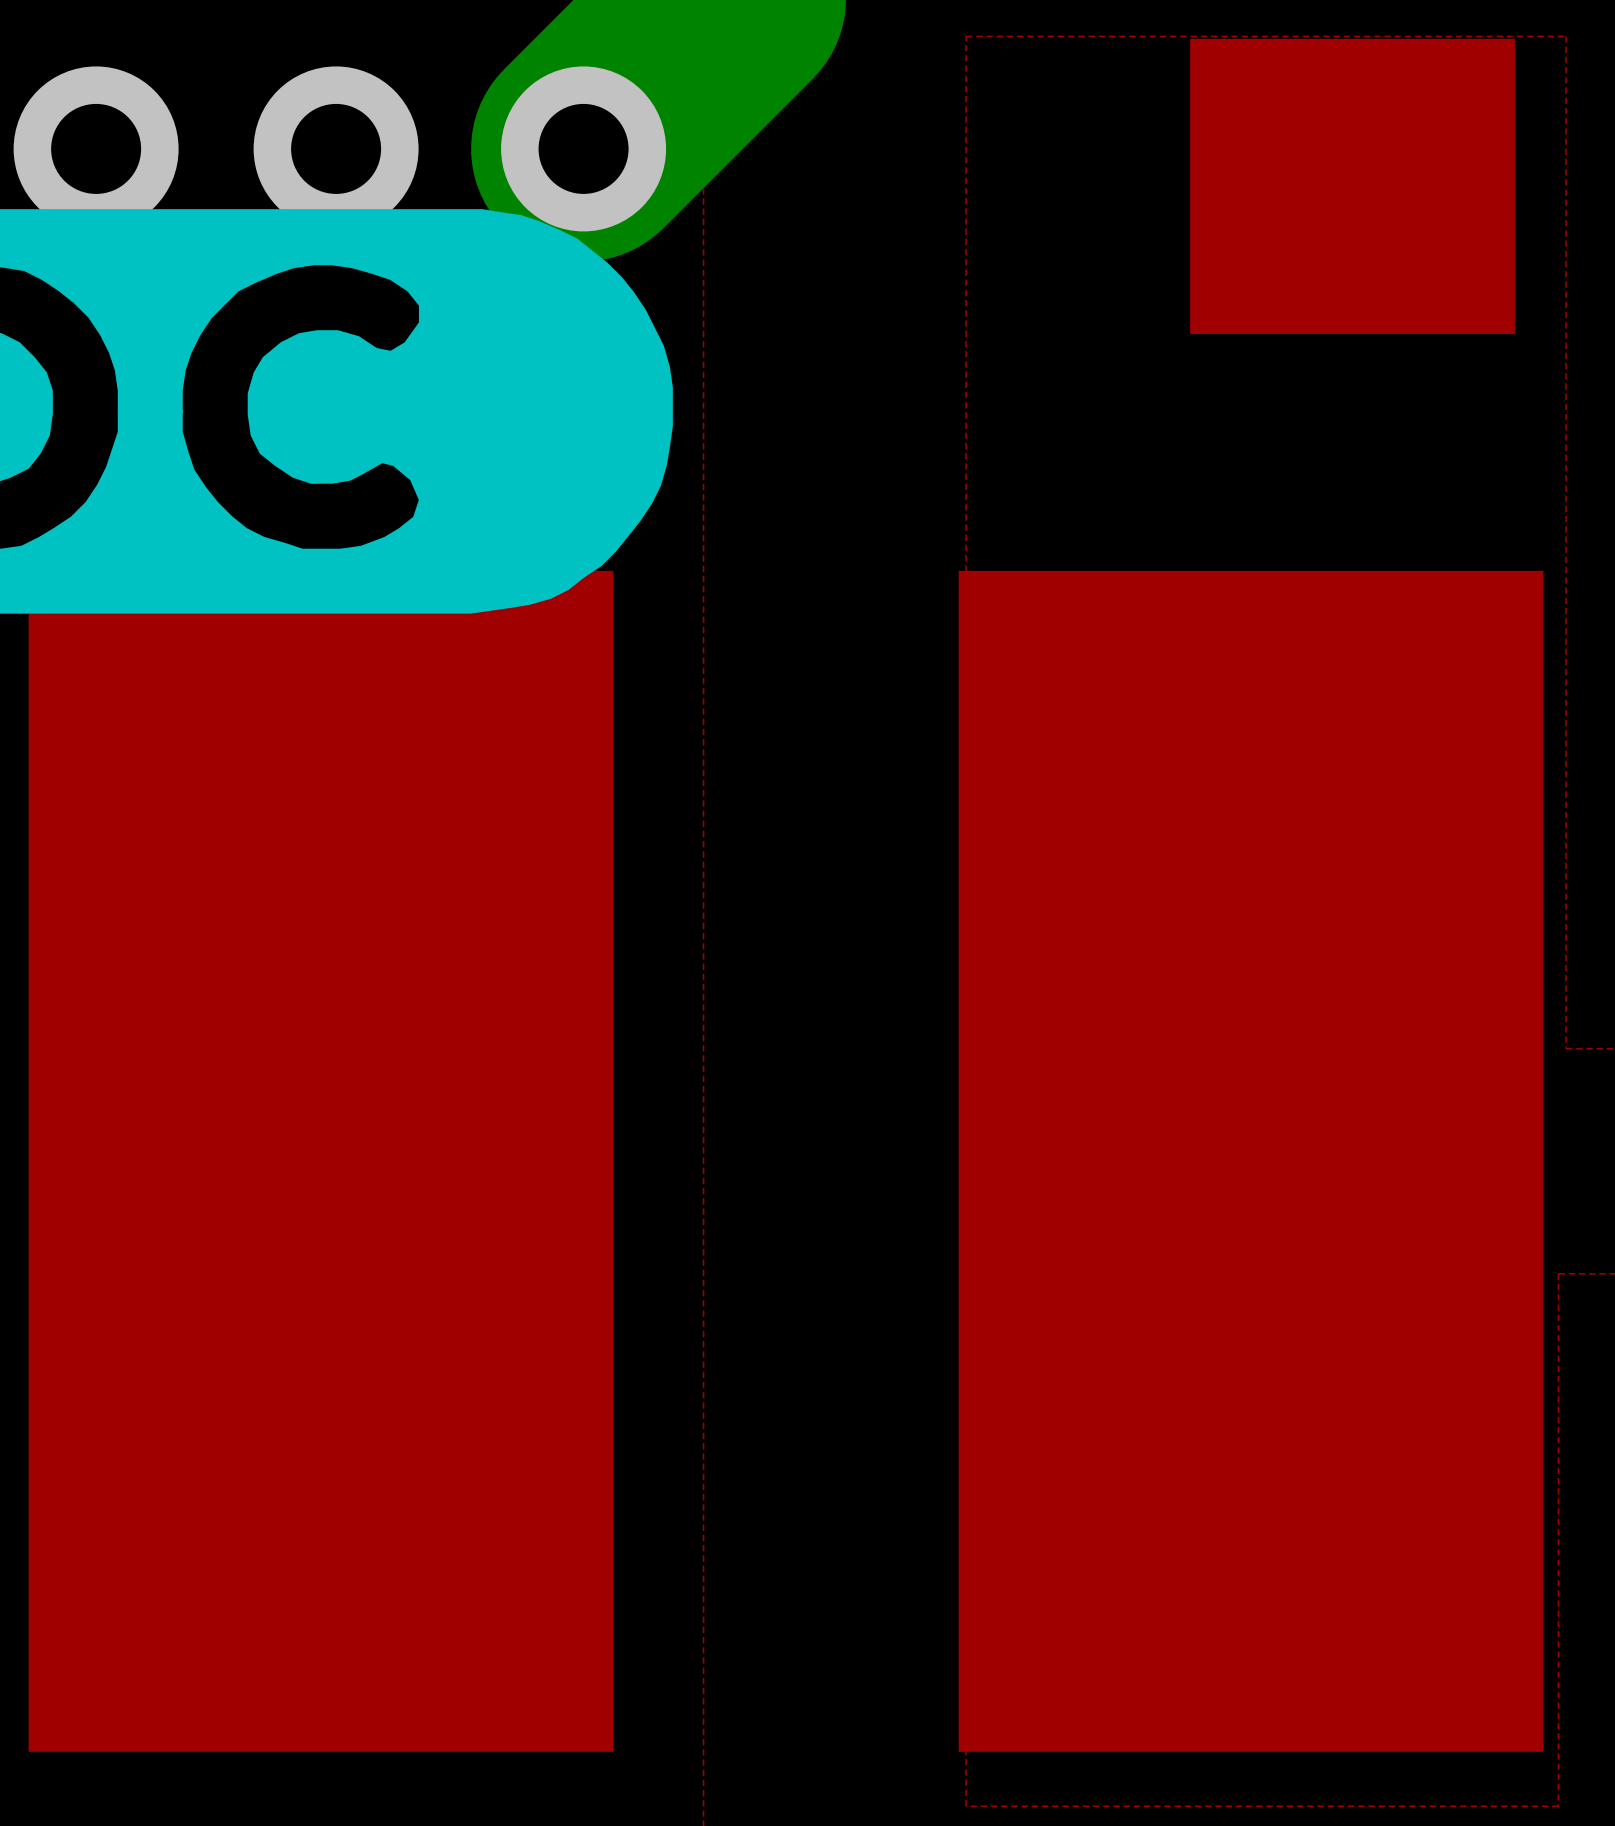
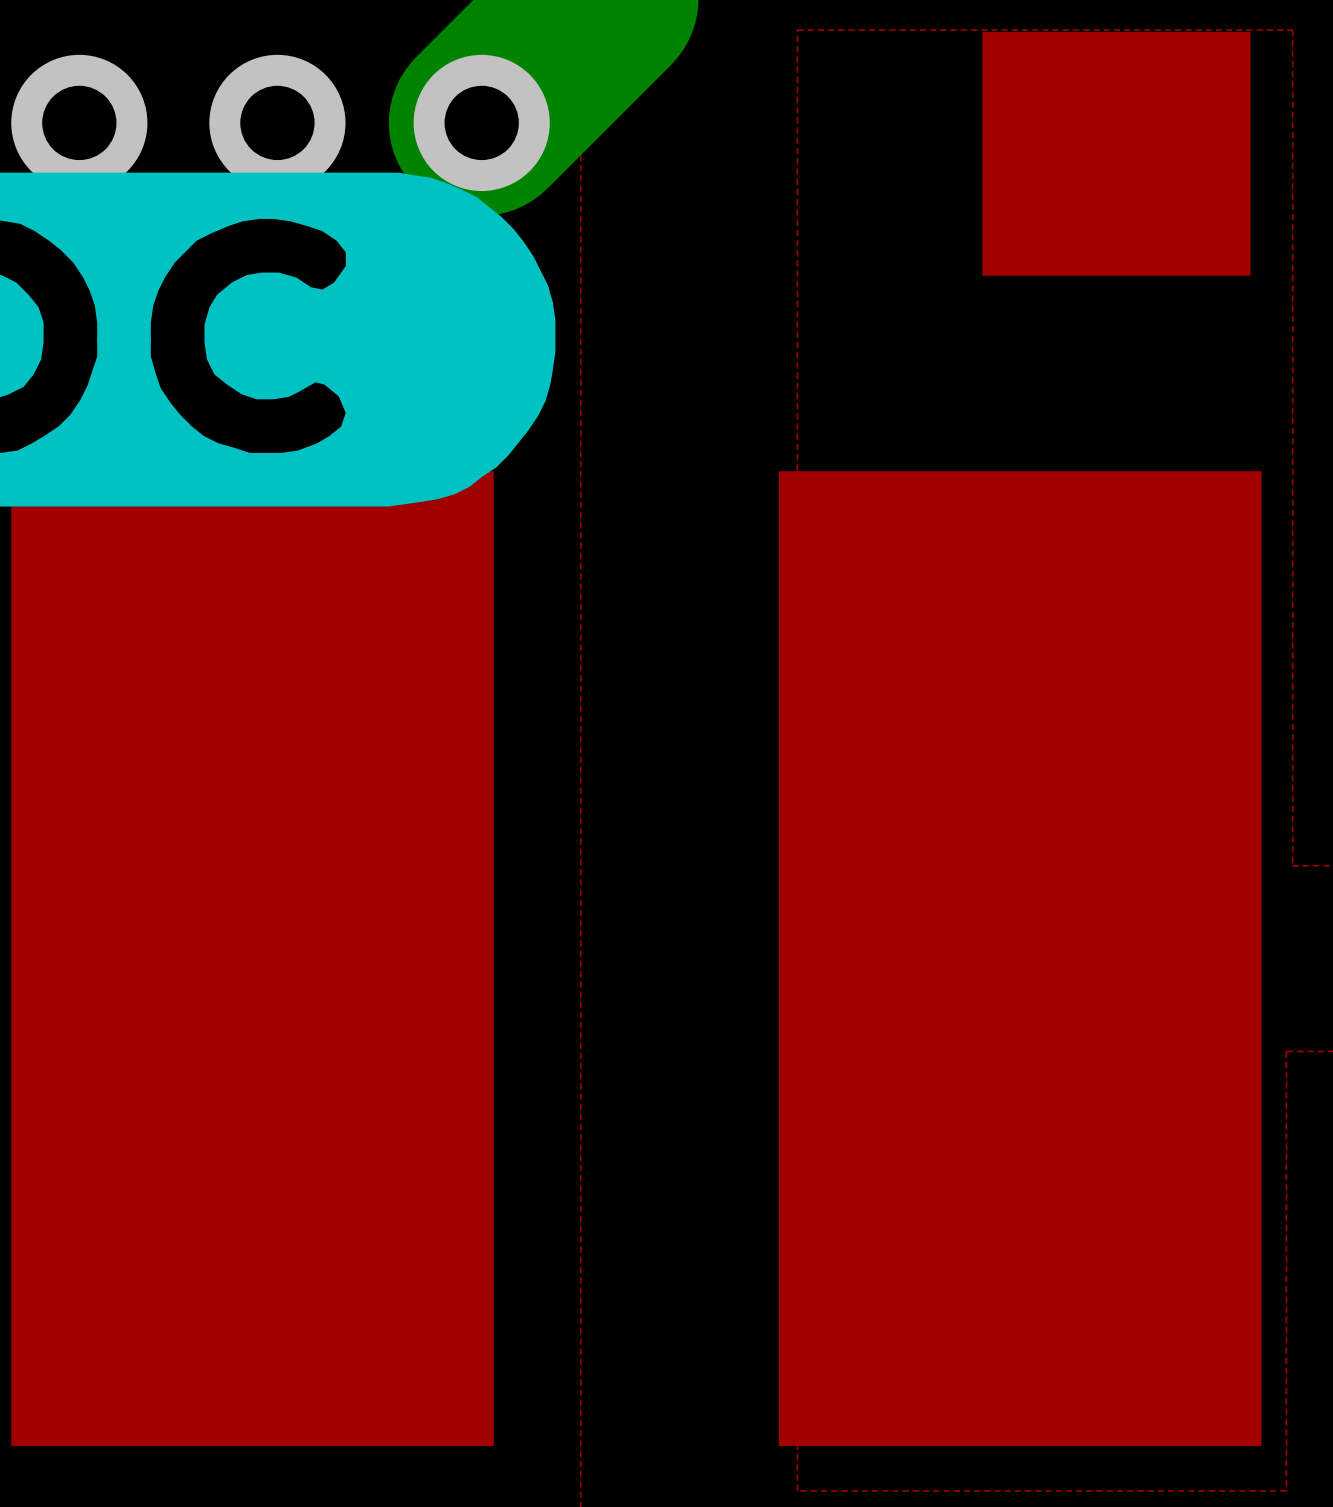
part position: (785, 1161) -> (636, 958)

